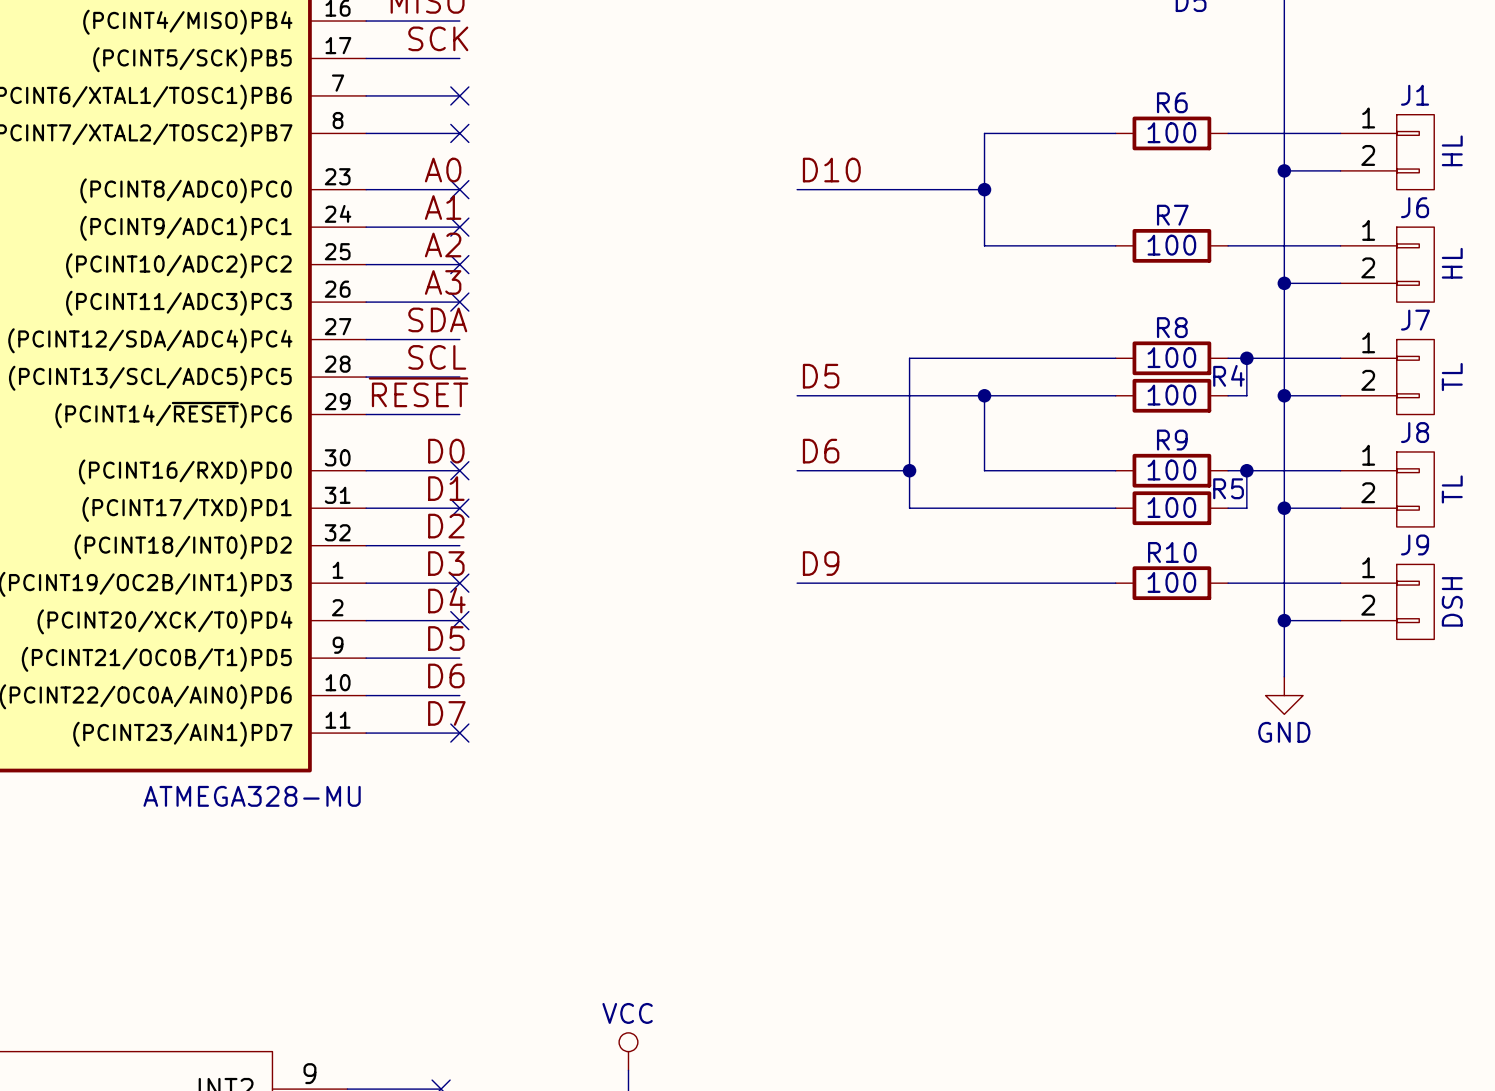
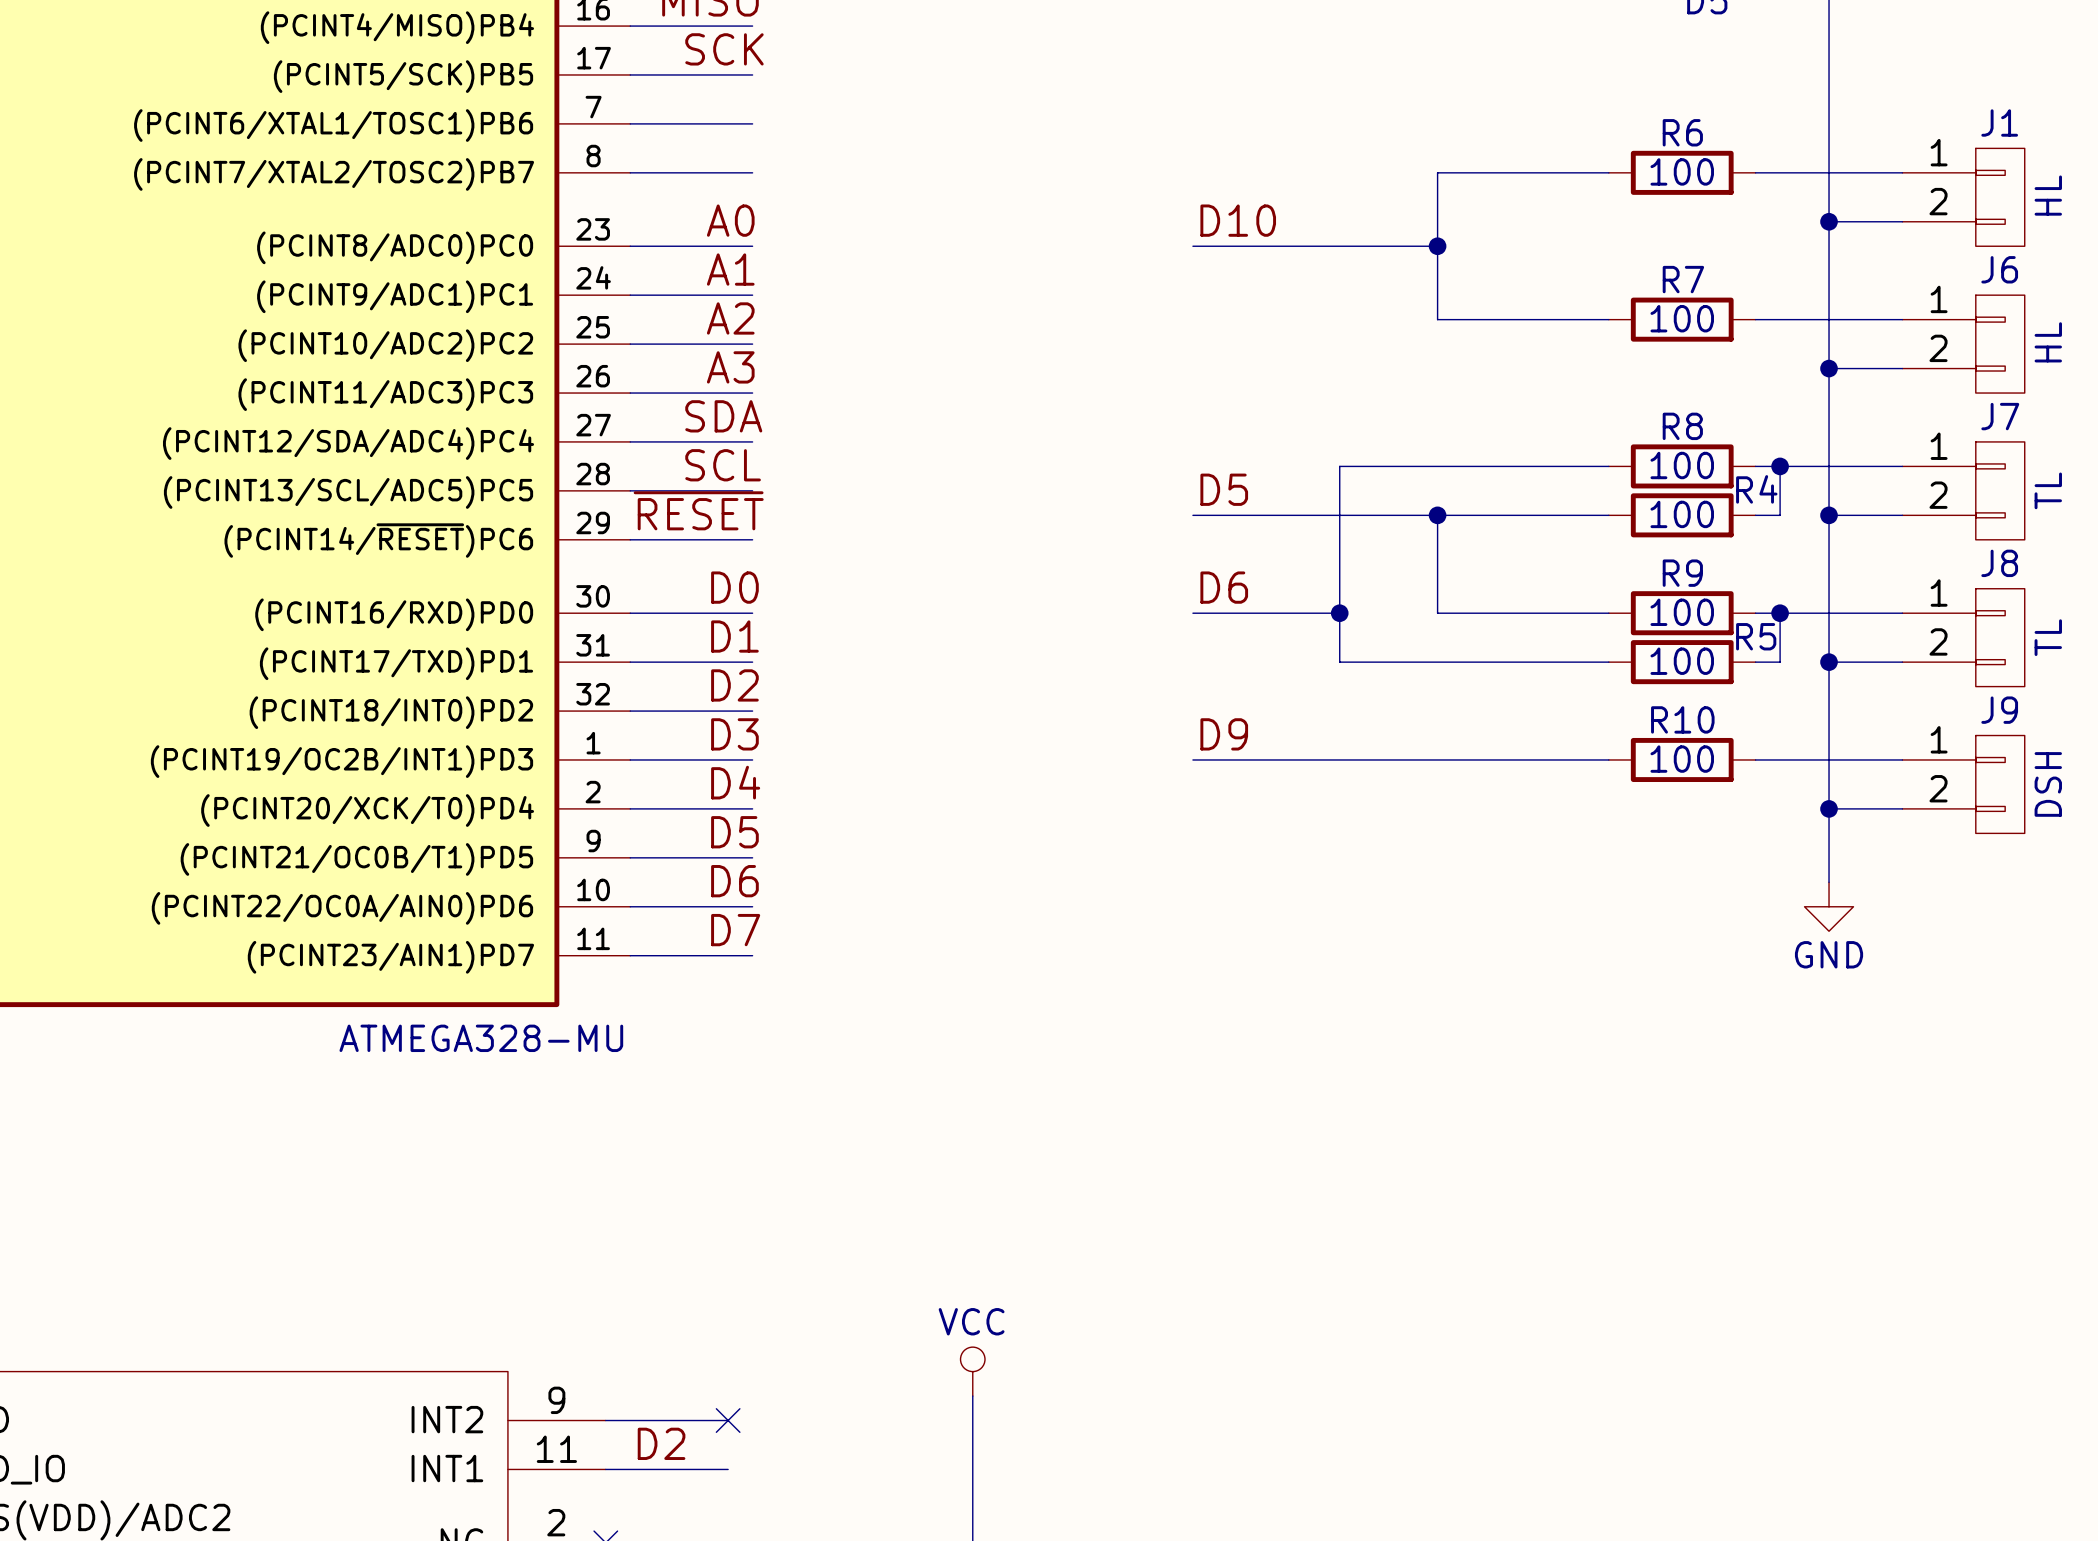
no-connect mark: (459, 95) -> none
no-connect mark: (459, 133) -> none
no-connect mark: (459, 189) -> none
no-connect mark: (459, 227) -> none
no-connect mark: (459, 264) -> none
no-connect mark: (459, 302) -> none
no-connect mark: (459, 470) -> none
no-connect mark: (459, 508) -> none
no-connect mark: (459, 583) -> none
no-connect mark: (459, 620) -> none
no-connect mark: (459, 733) -> none

